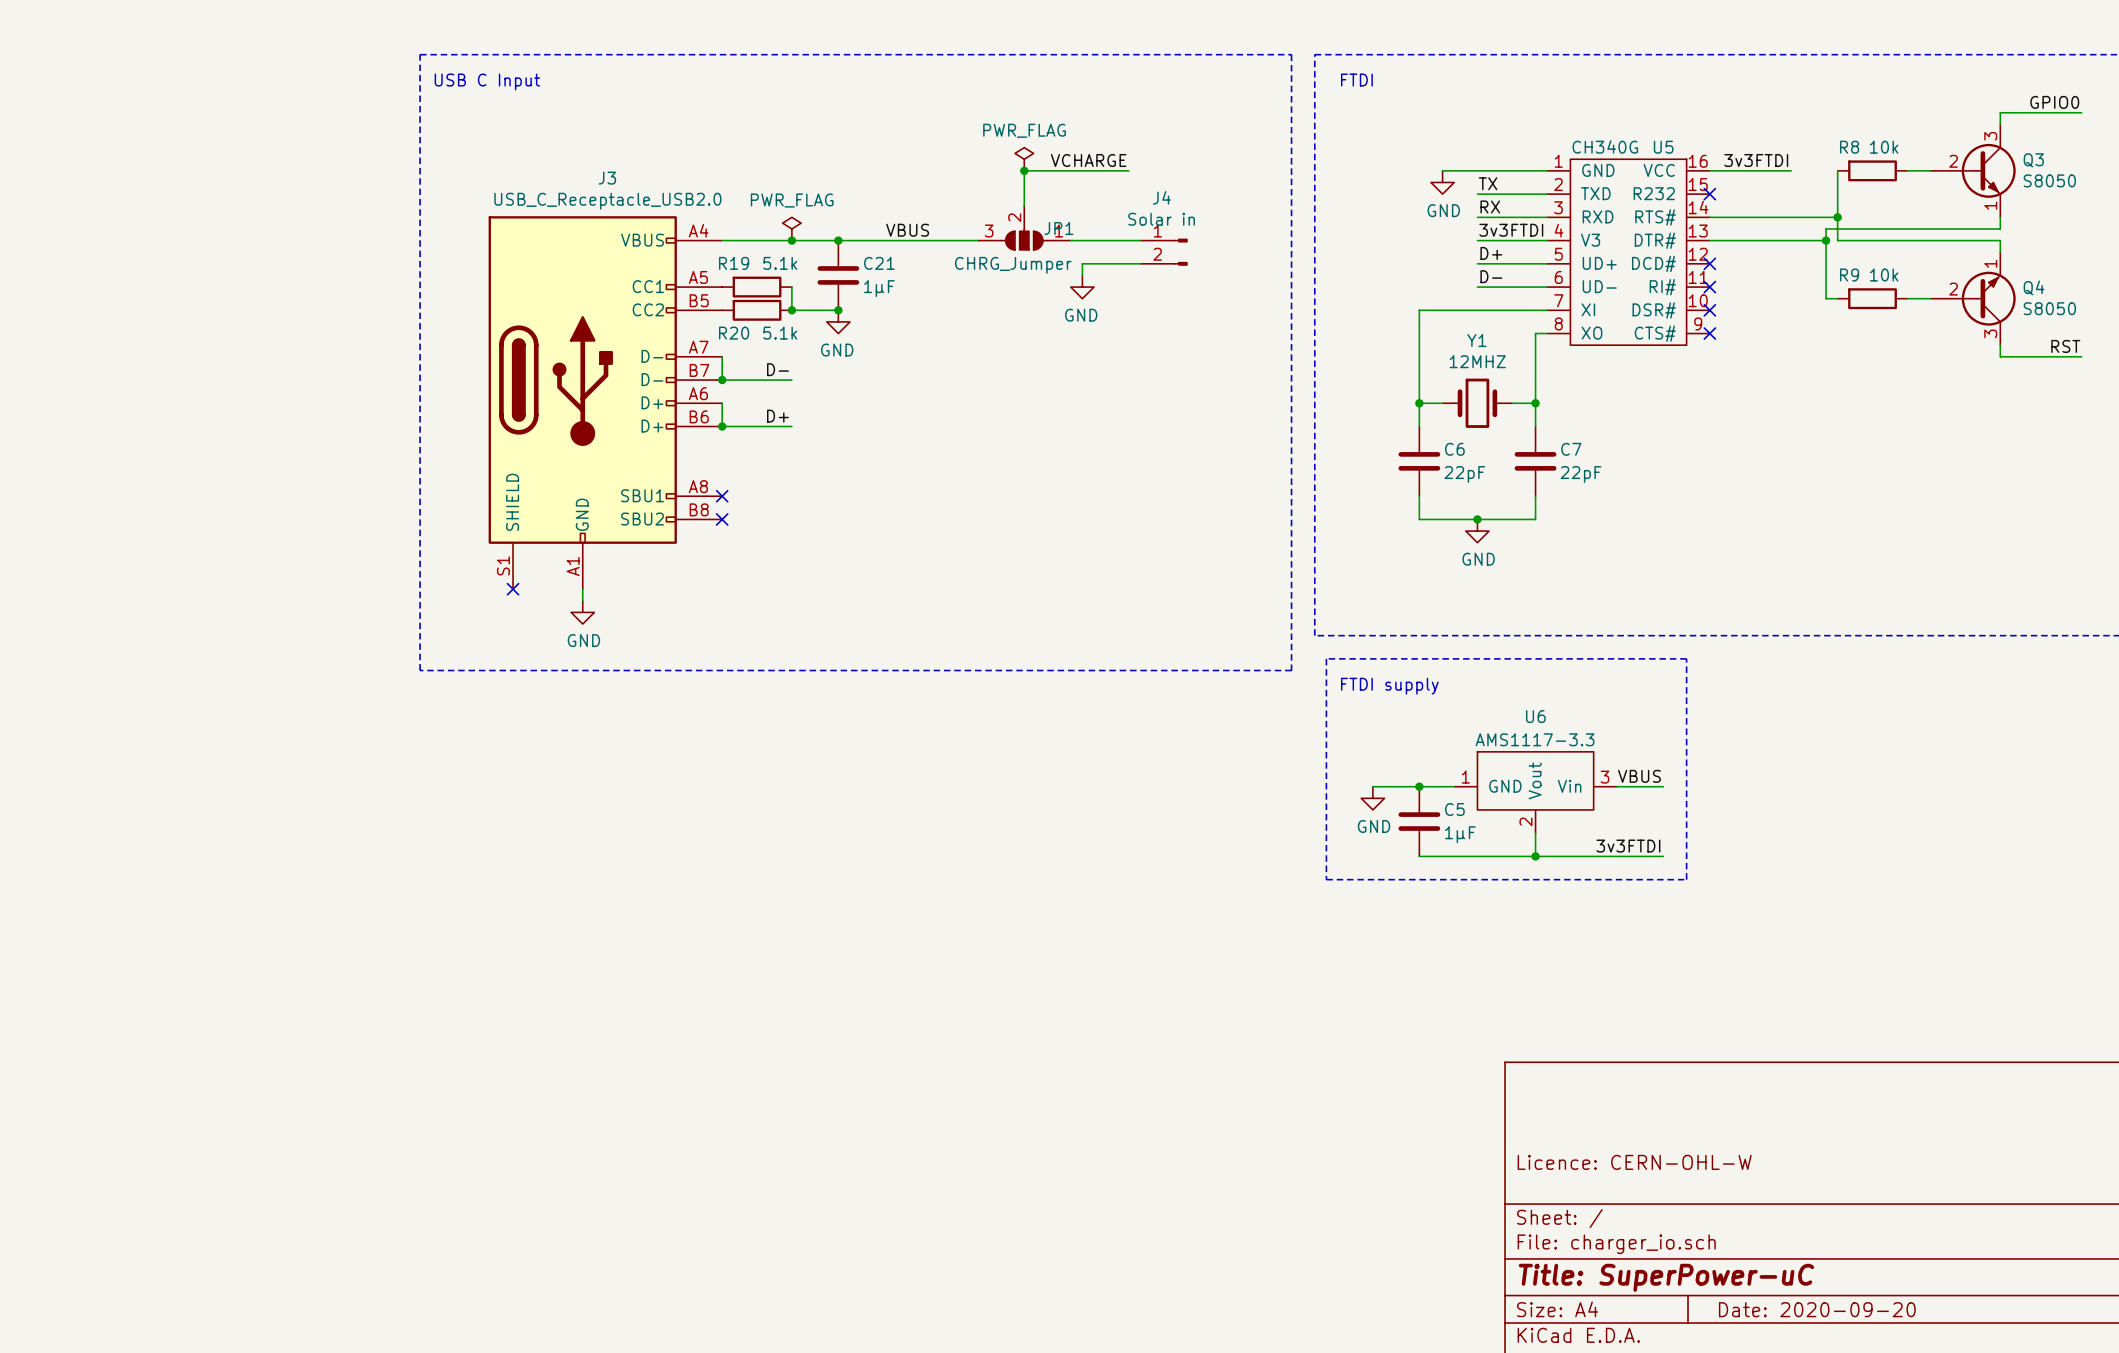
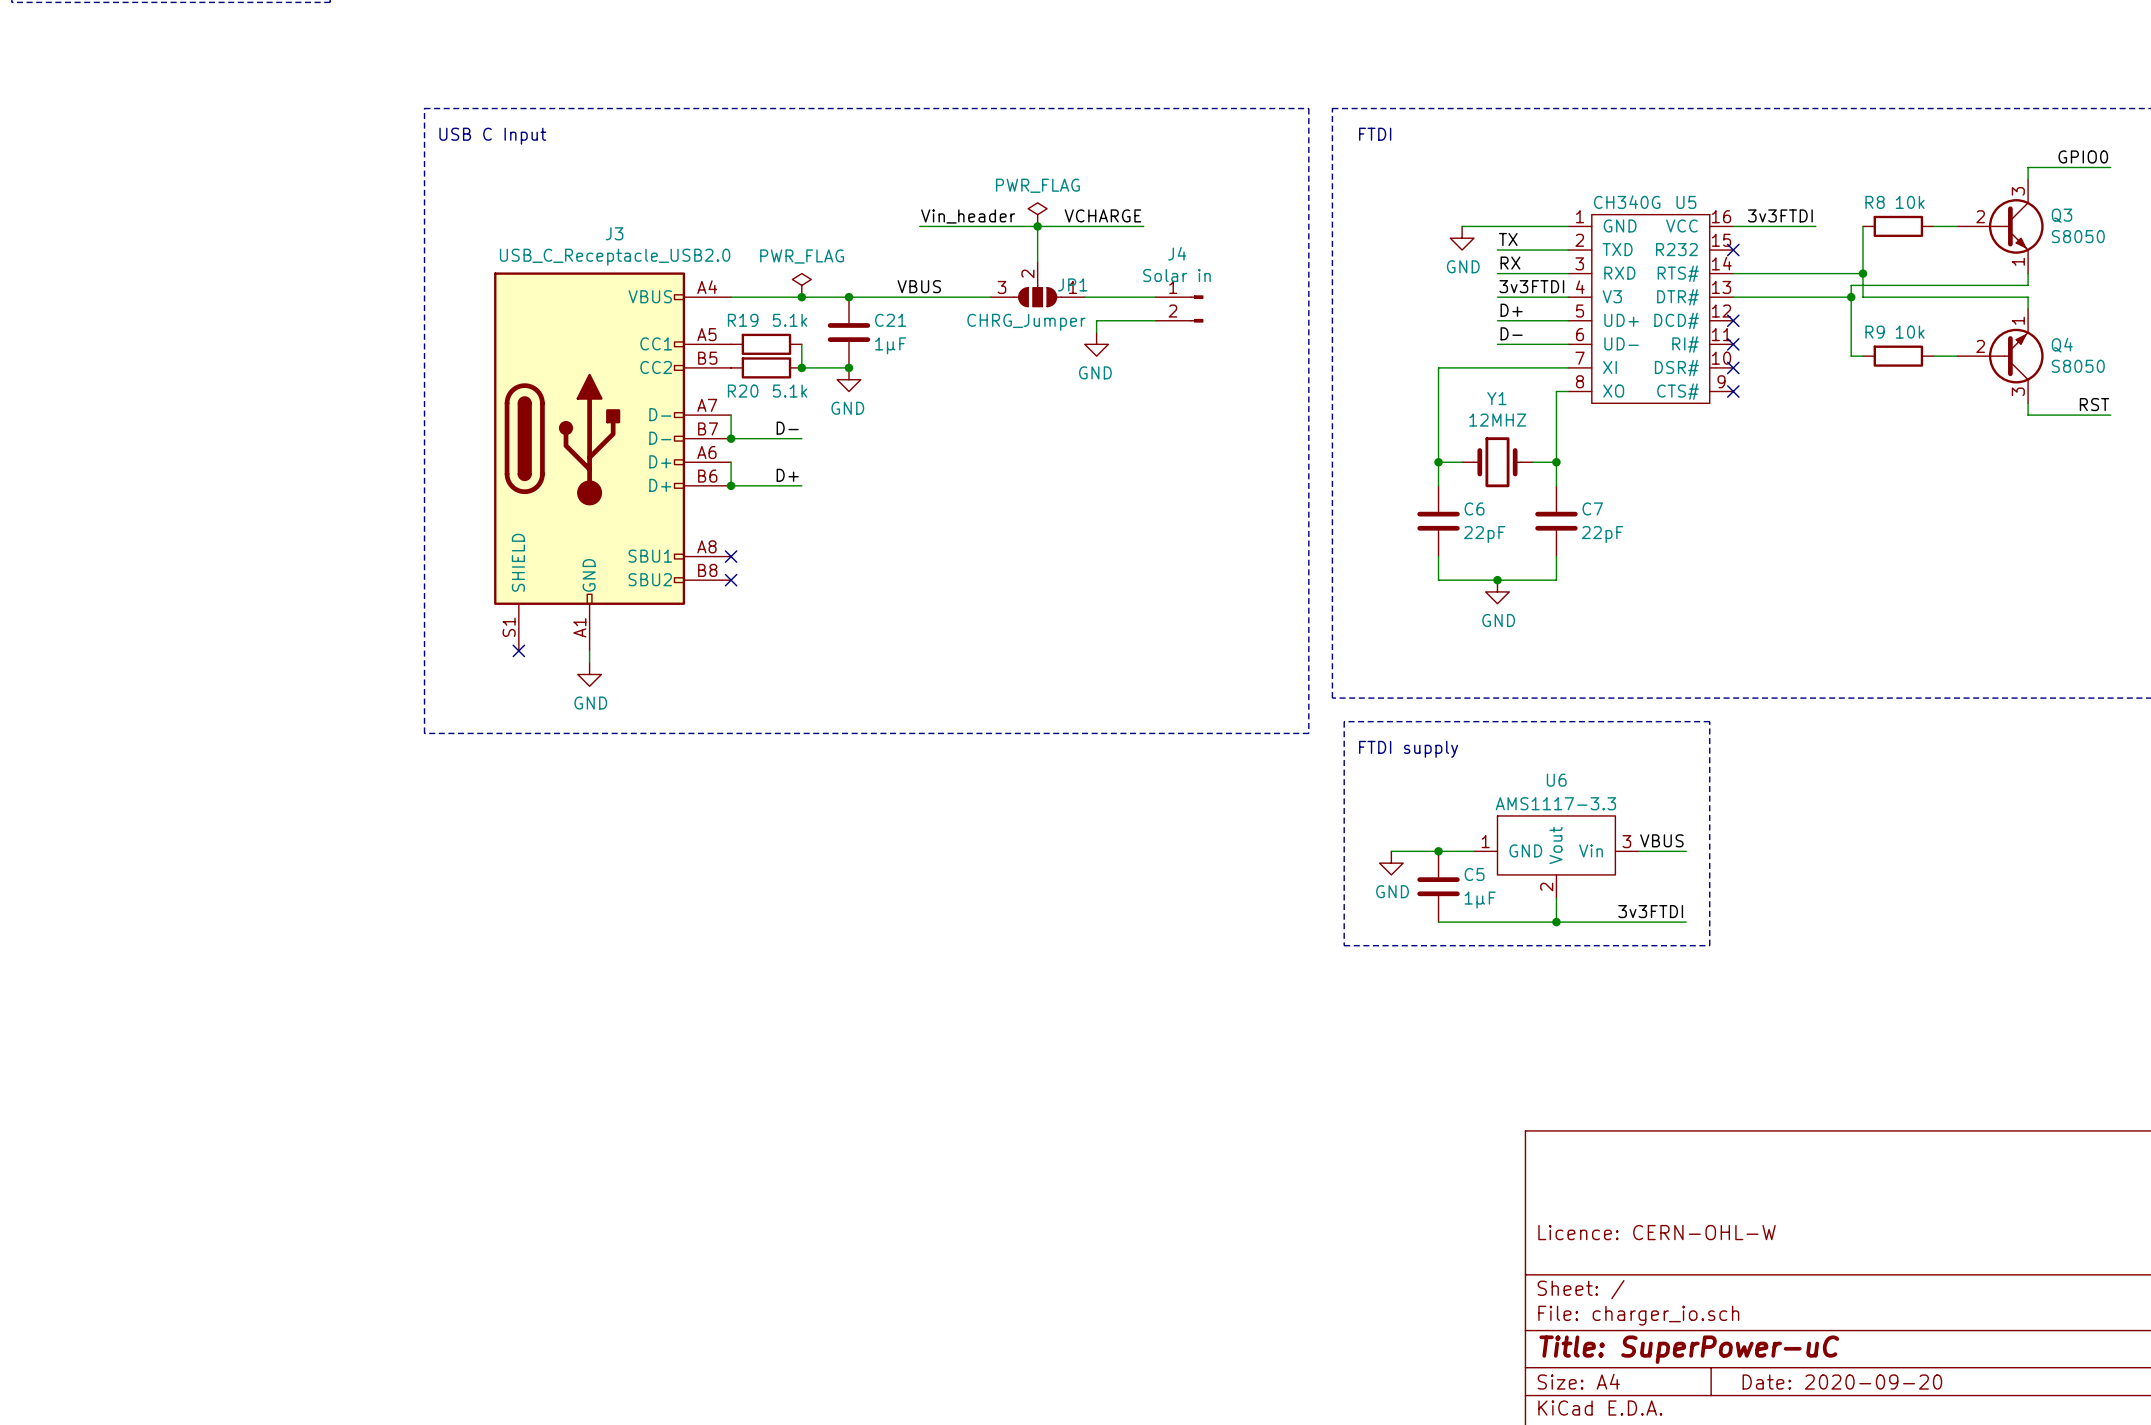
label: none -> Vin_header (968, 216)
wire: none -> (919, 226) (1037, 226)

